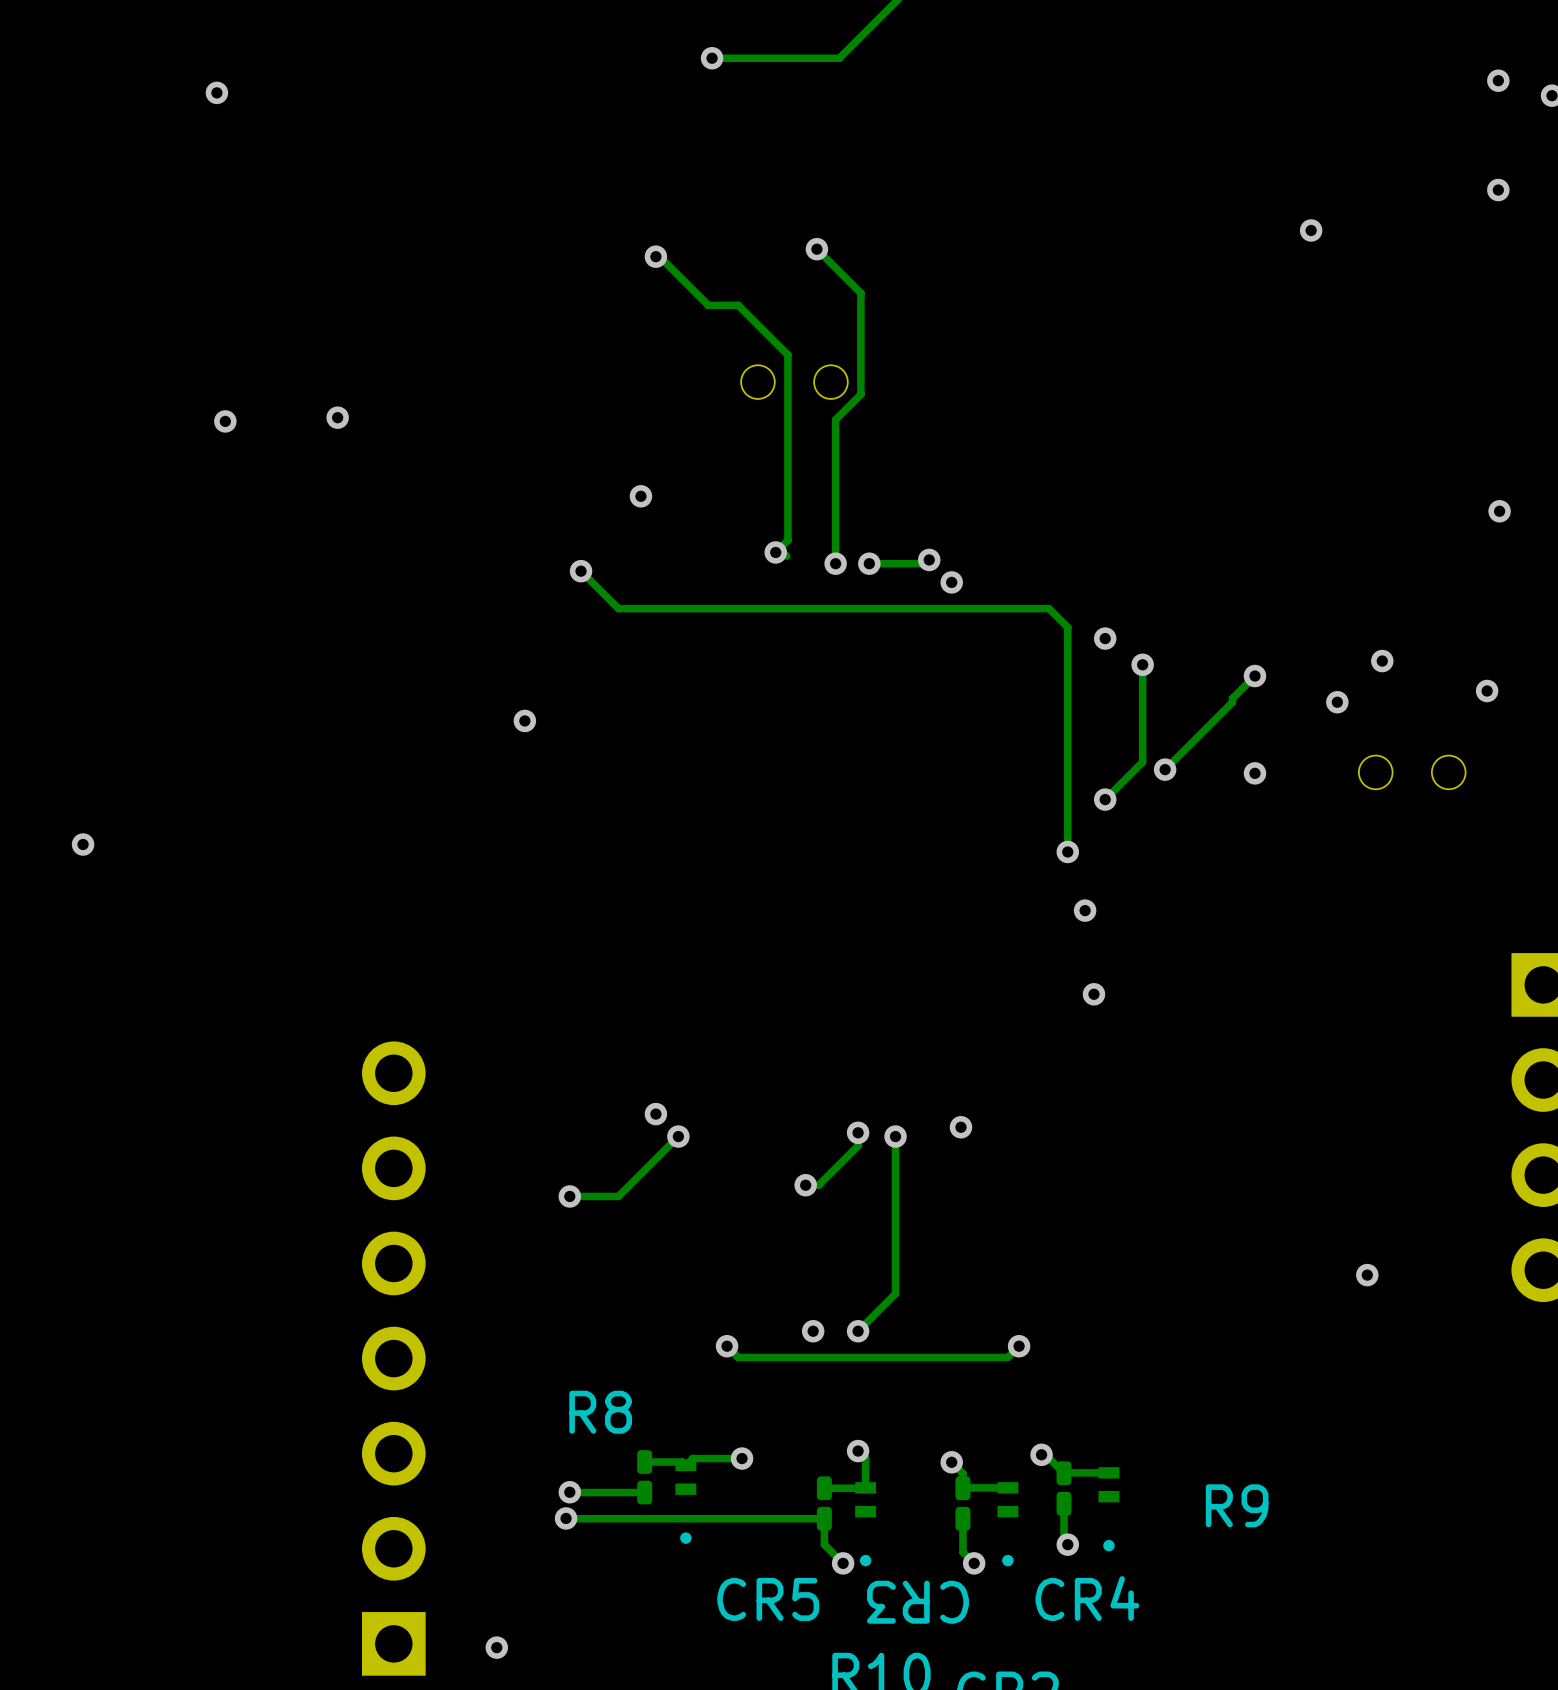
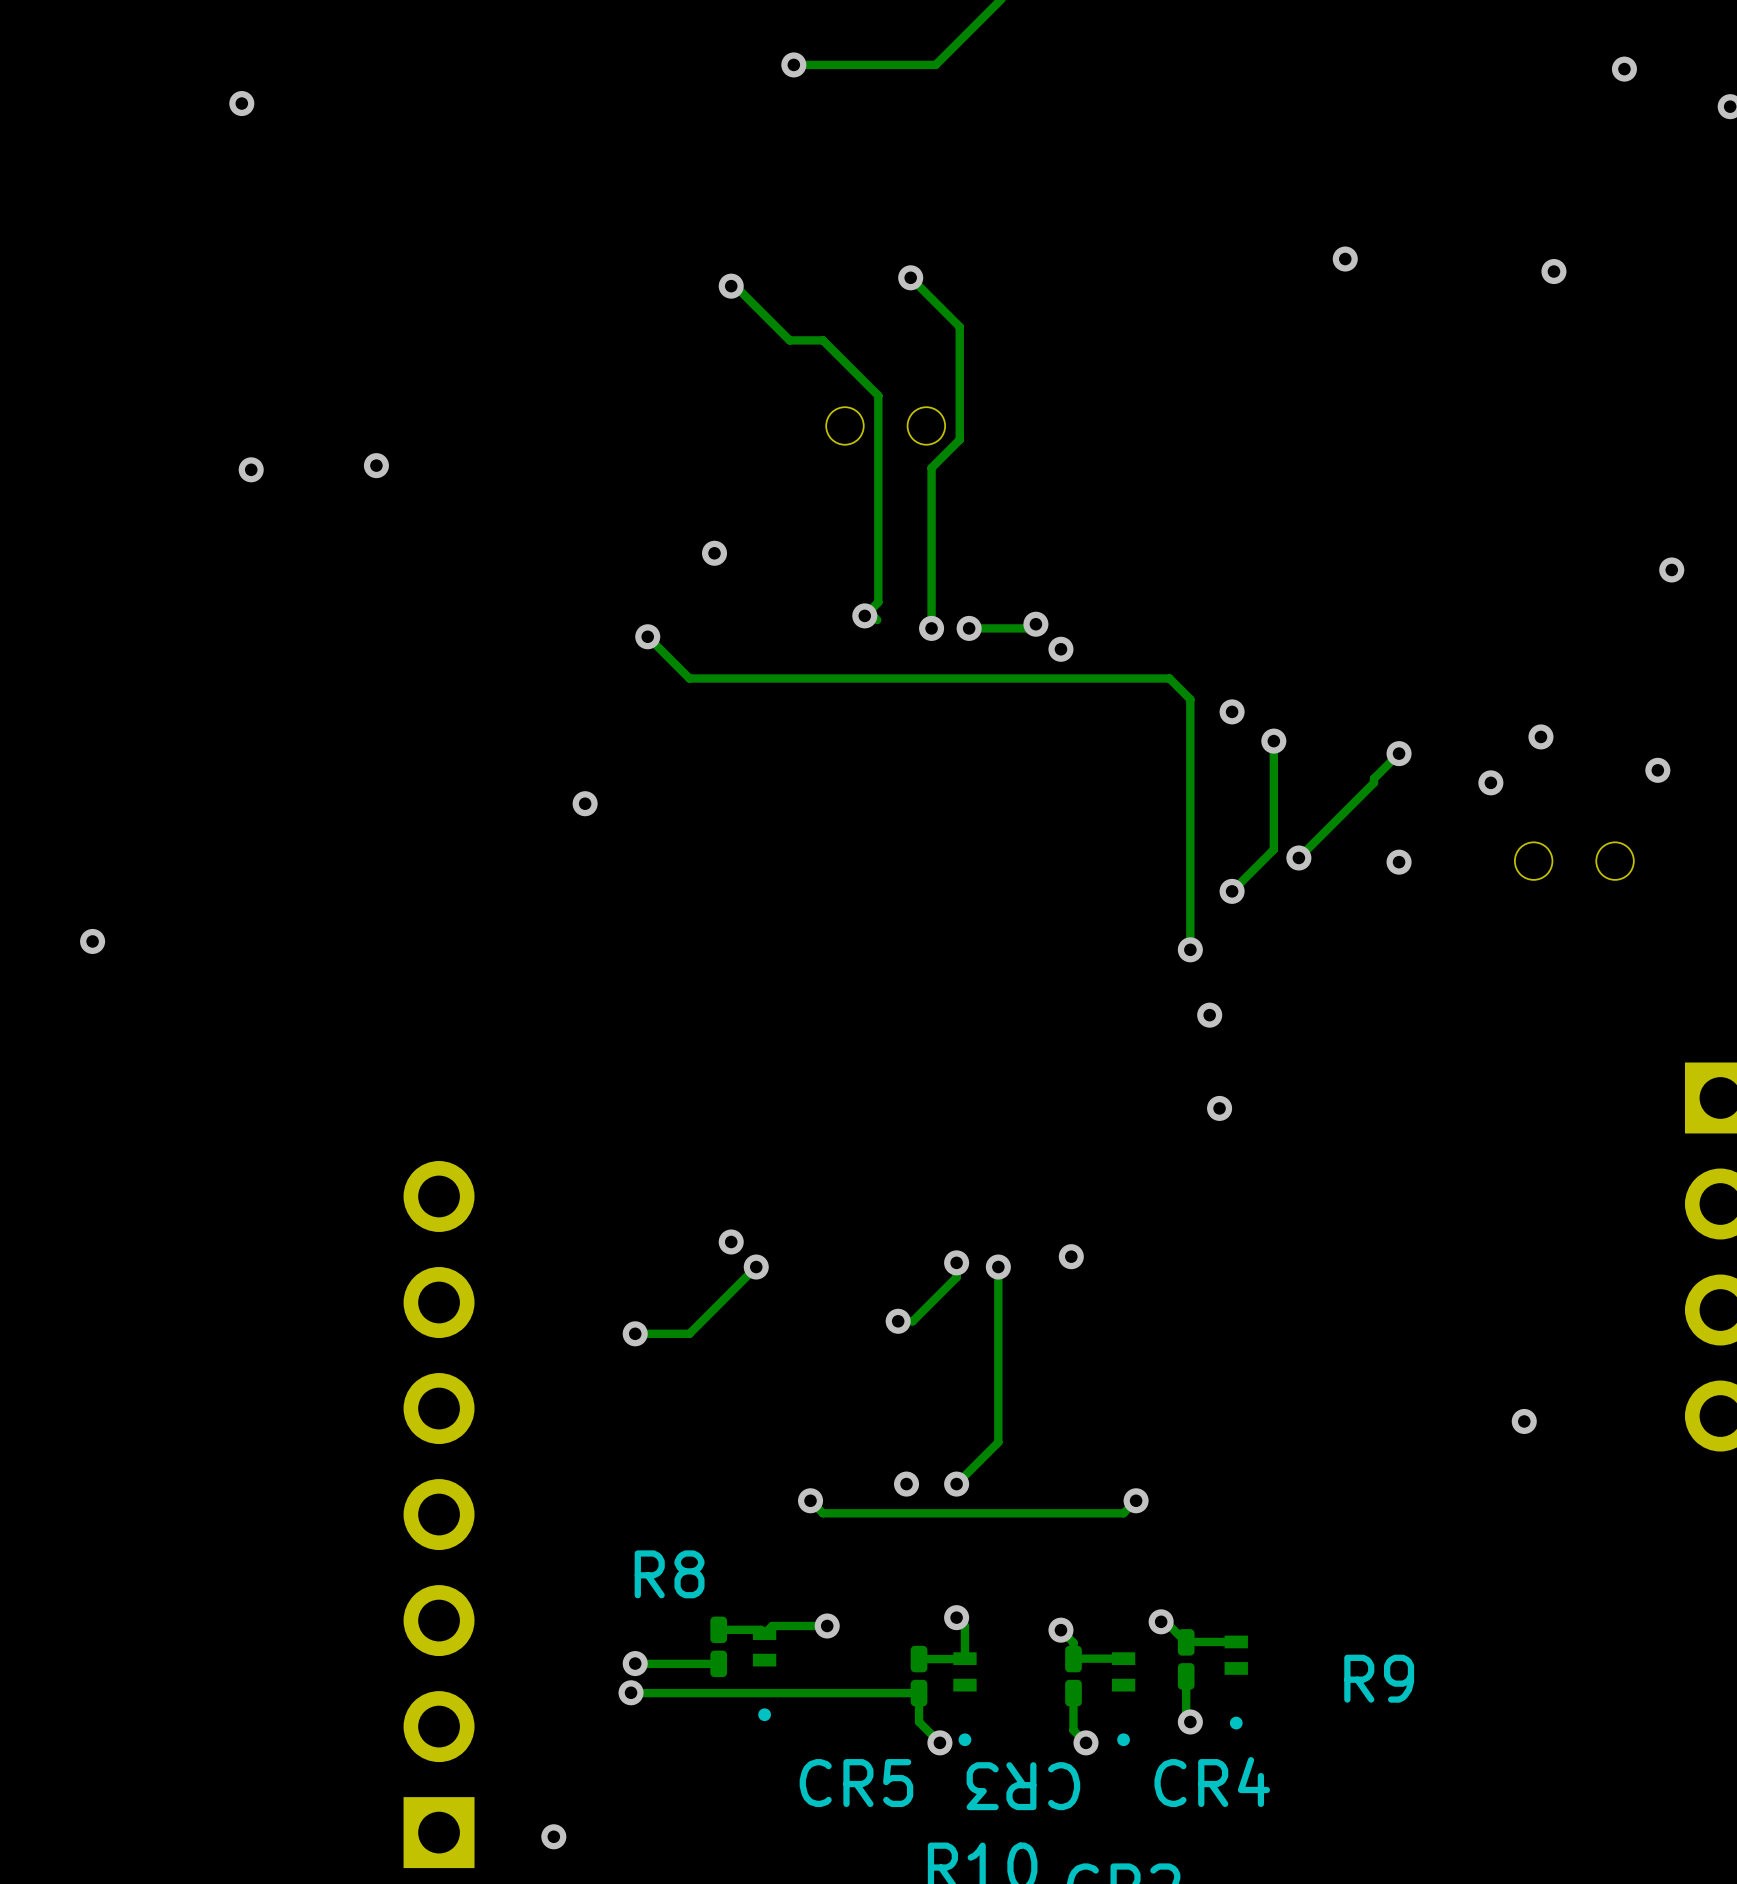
via position: (1498, 80) -> (1624, 69)
via: (1498, 190) -> none
via: (1311, 230) -> none
via: none -> (1345, 259)
via: none -> (1553, 271)

